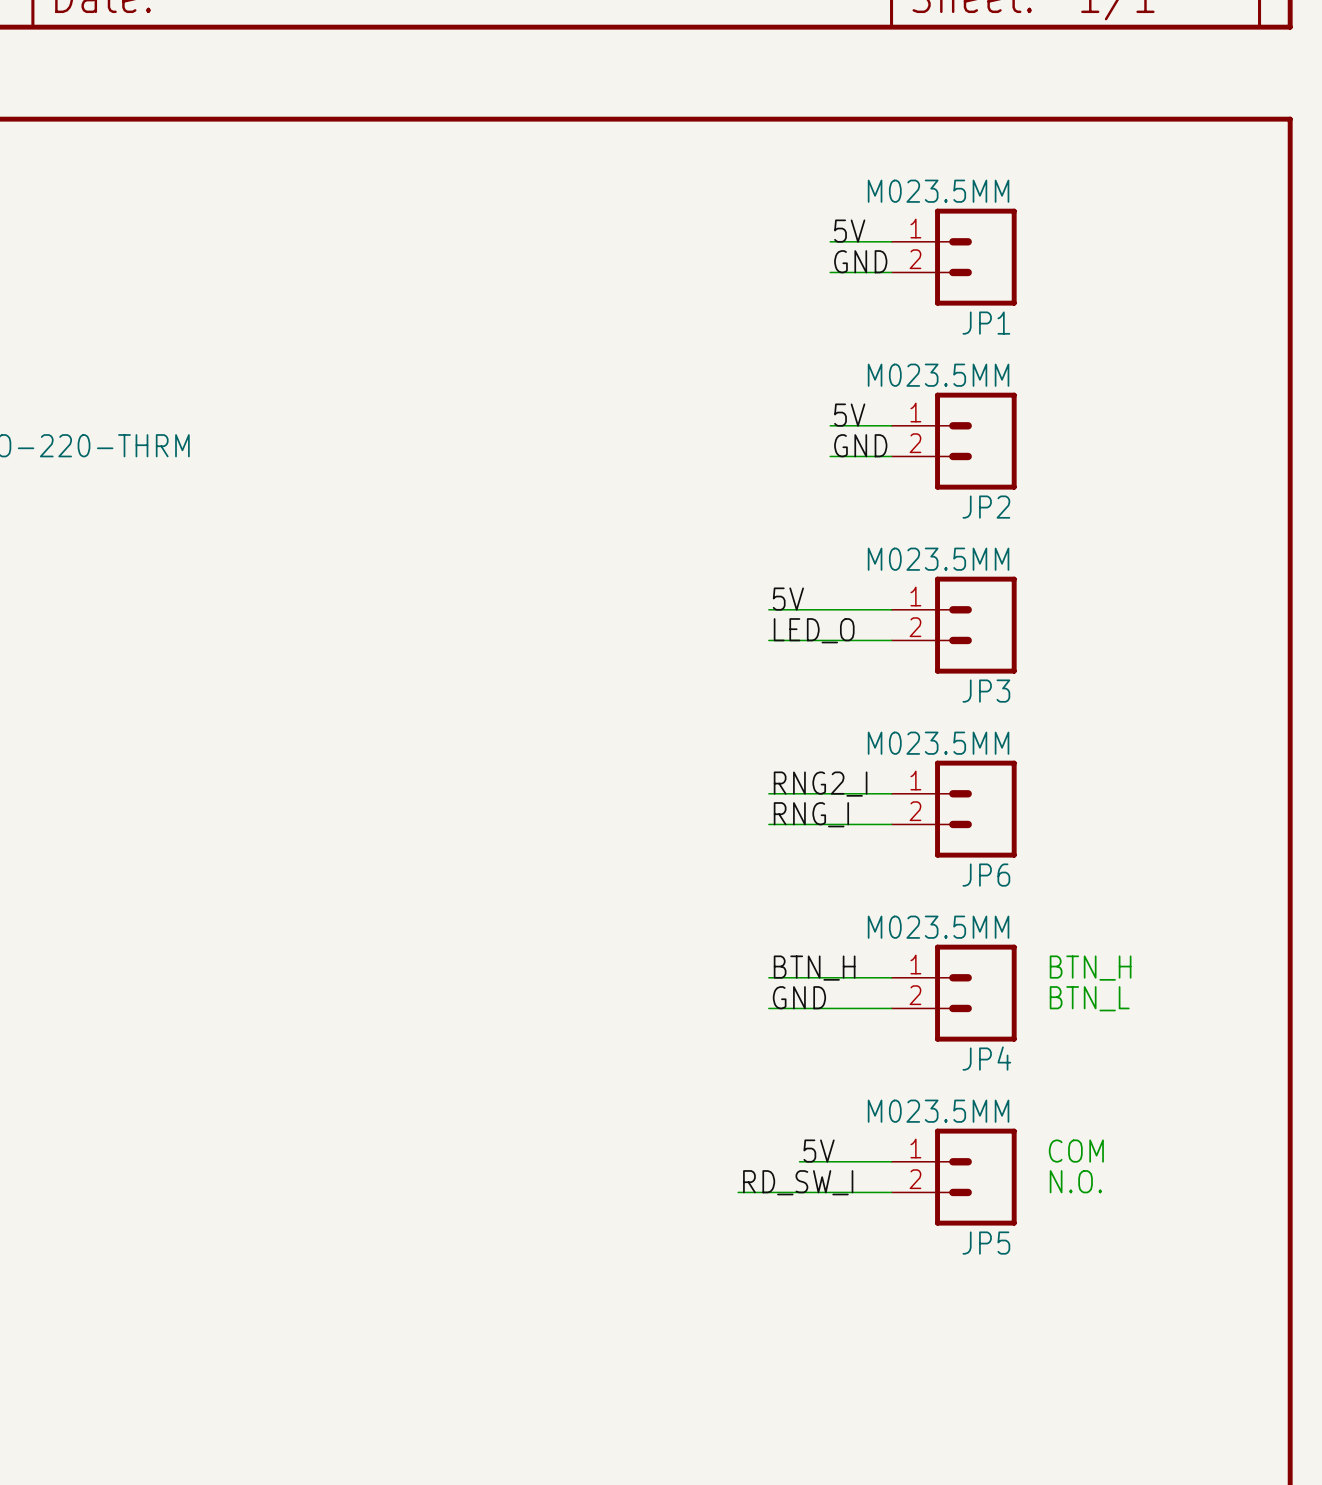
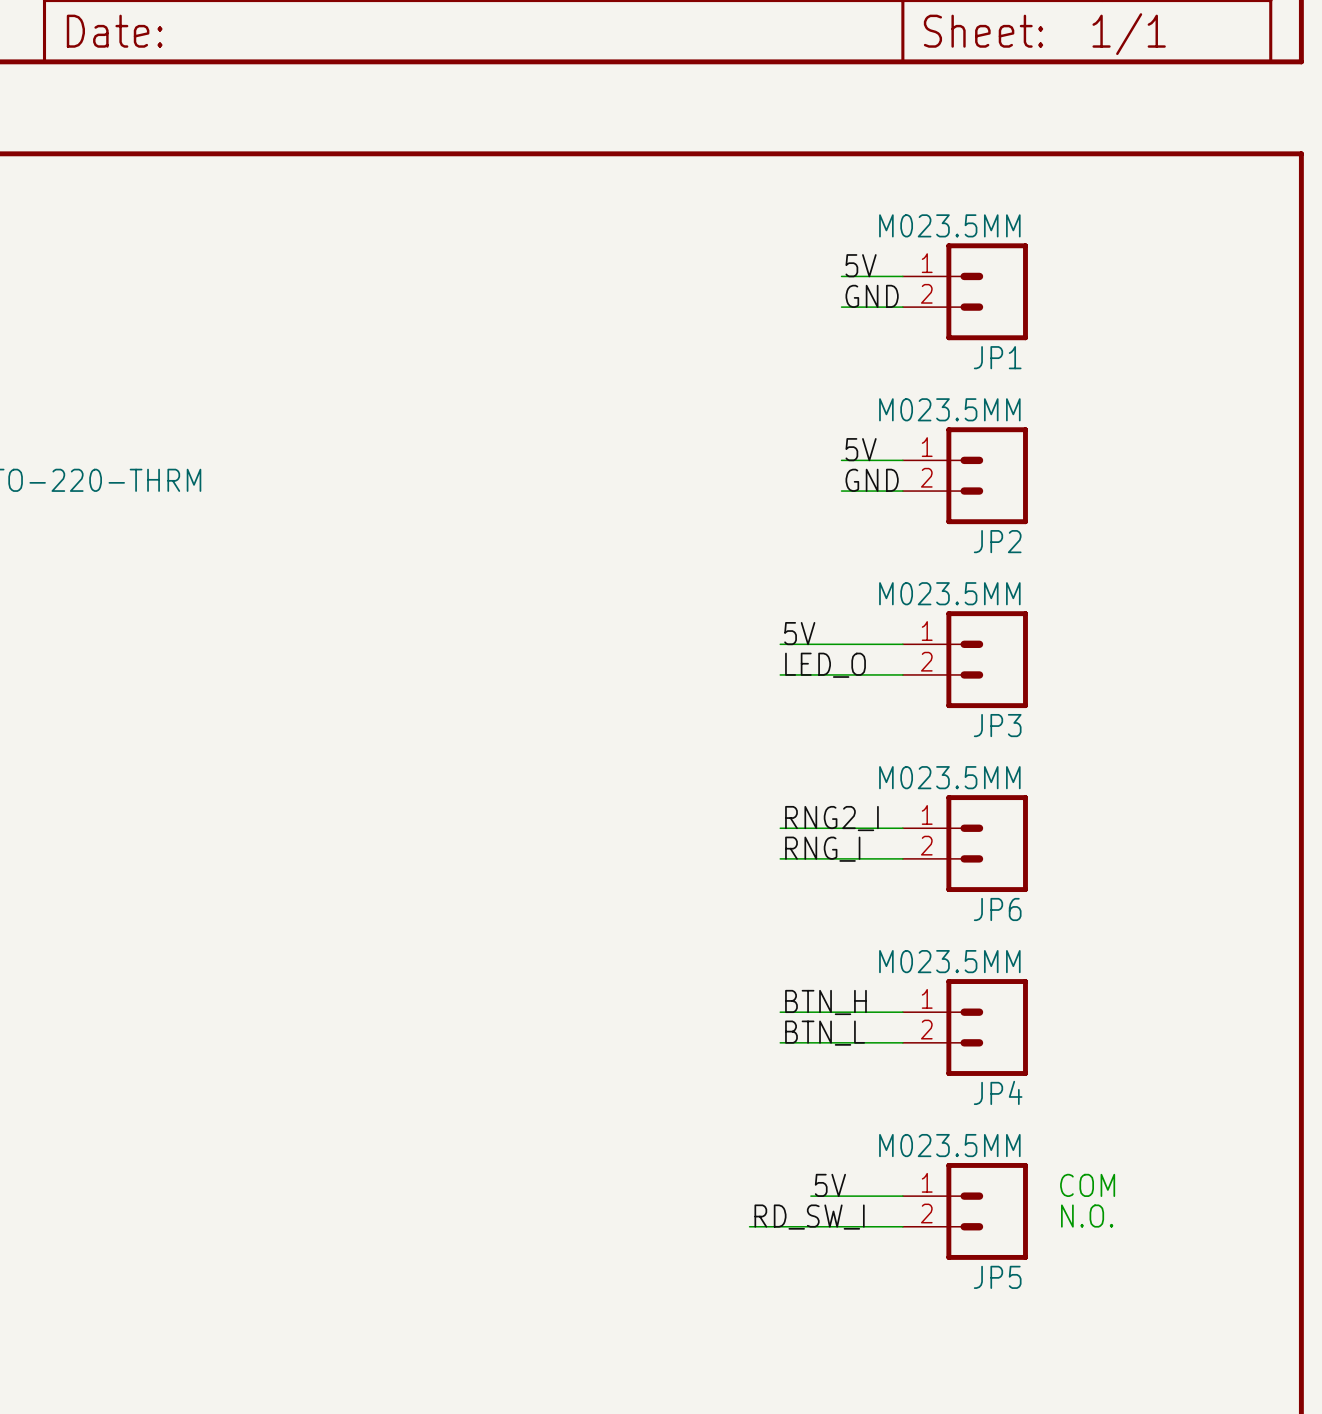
text: BTN_H (1090, 968) -> none
label: GND (799, 997) -> BTN_L (825, 1033)
text: BTN_L (1089, 998) -> none

